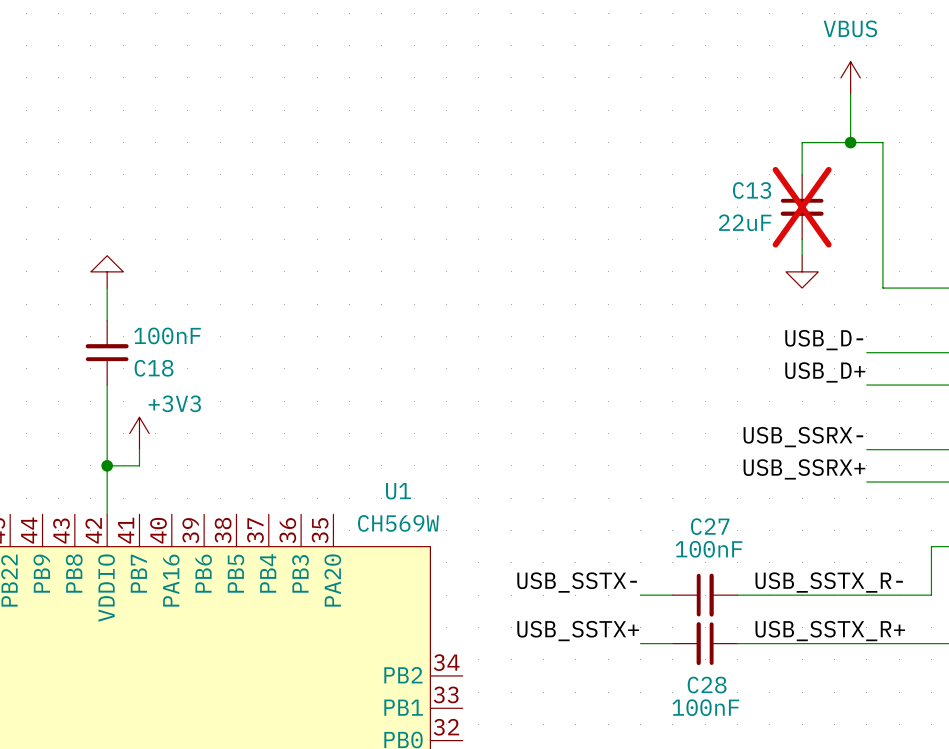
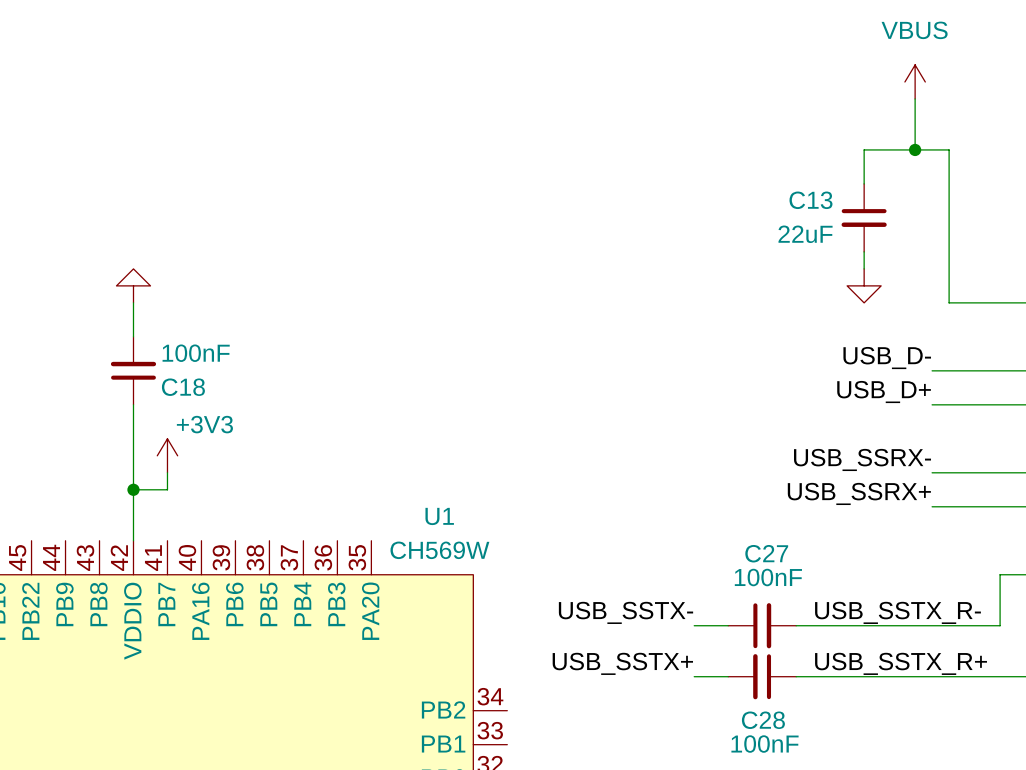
C13 do-not-place cross: (802, 207) -> none

